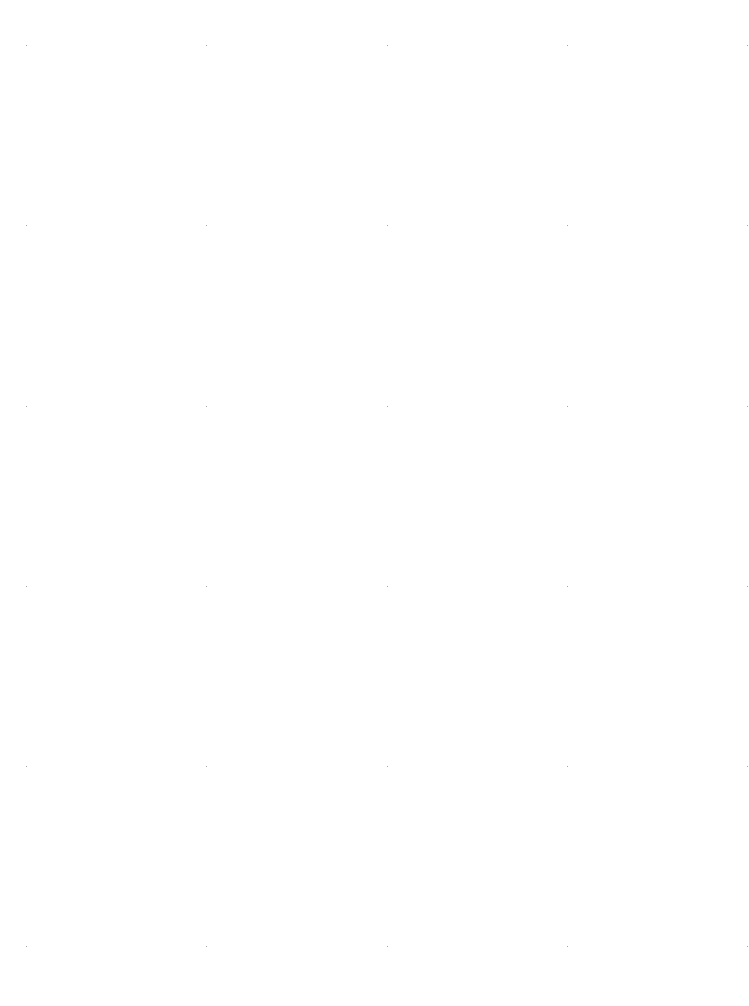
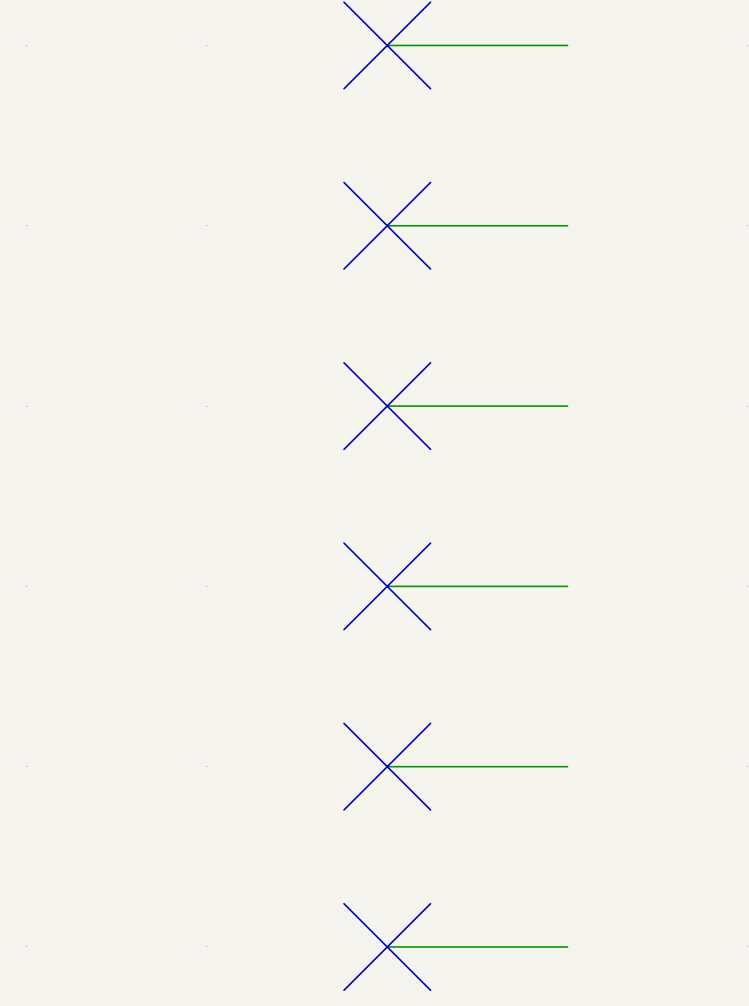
wire: none -> (387, 45) (567, 45)
no-connect mark: none -> (387, 45)
wire: none -> (387, 225) (567, 225)
no-connect mark: none -> (387, 225)
wire: none -> (387, 406) (567, 406)
no-connect mark: none -> (387, 406)
wire: none -> (387, 586) (567, 586)
no-connect mark: none -> (387, 586)
wire: none -> (387, 766) (567, 766)
no-connect mark: none -> (387, 766)
wire: none -> (387, 946) (567, 946)
no-connect mark: none -> (387, 946)

